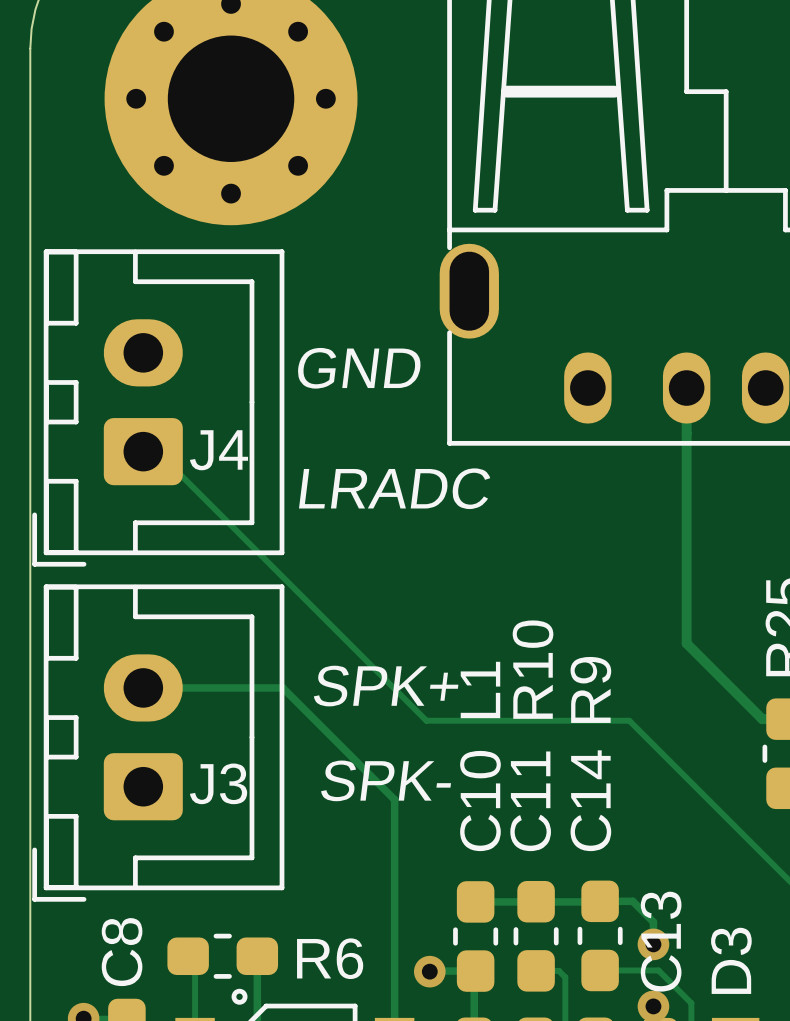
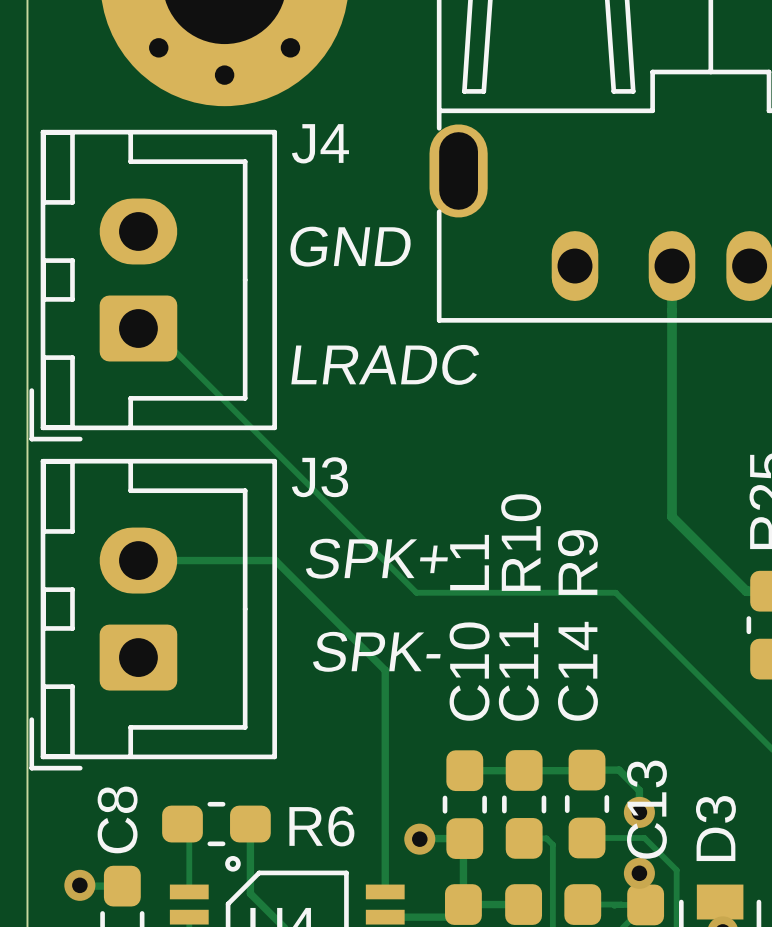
J4 name position: J4 (218, 450) -> J4 (320, 143)
J3 name position: J3 (218, 783) -> J3 (320, 477)

